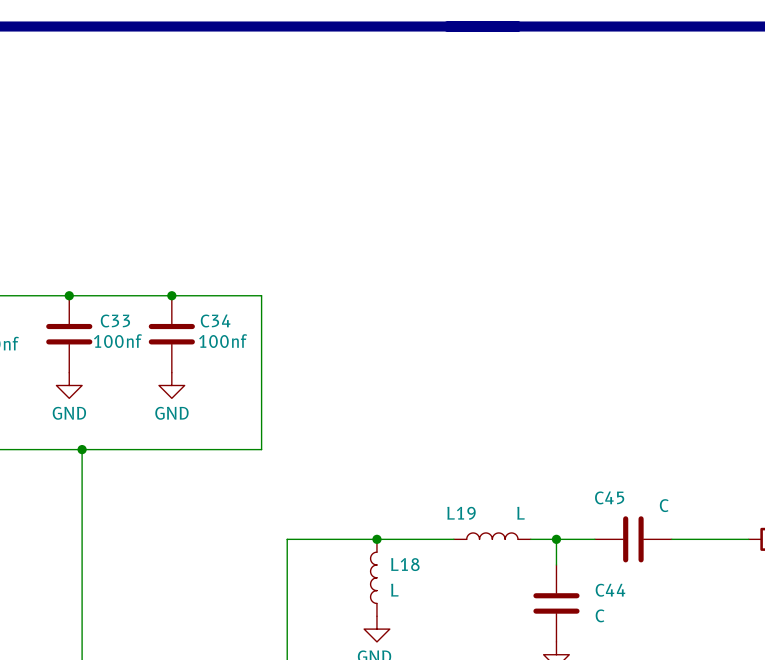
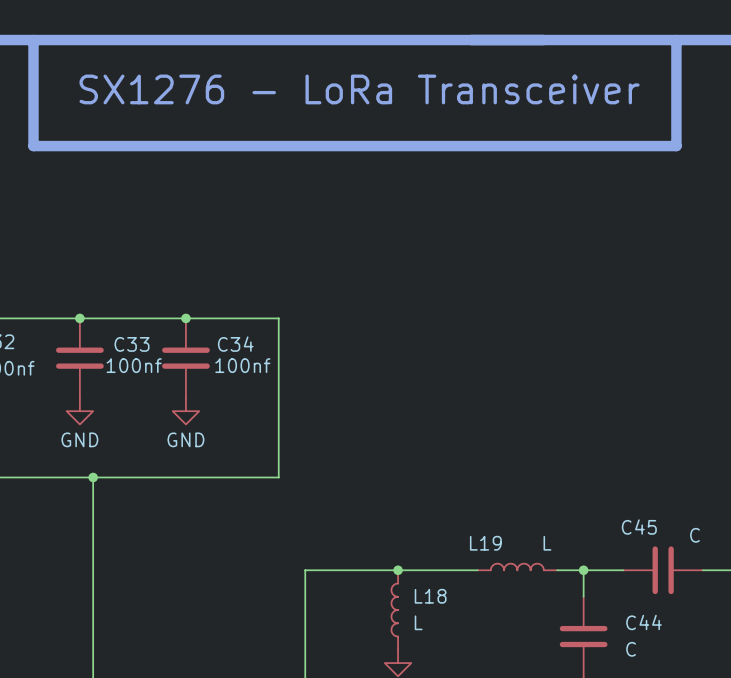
line: none -> (33, 40) (33, 146) (676, 146) (676, 40)
text: none -> SX1276 - LoRa Transceiver (359, 89)

